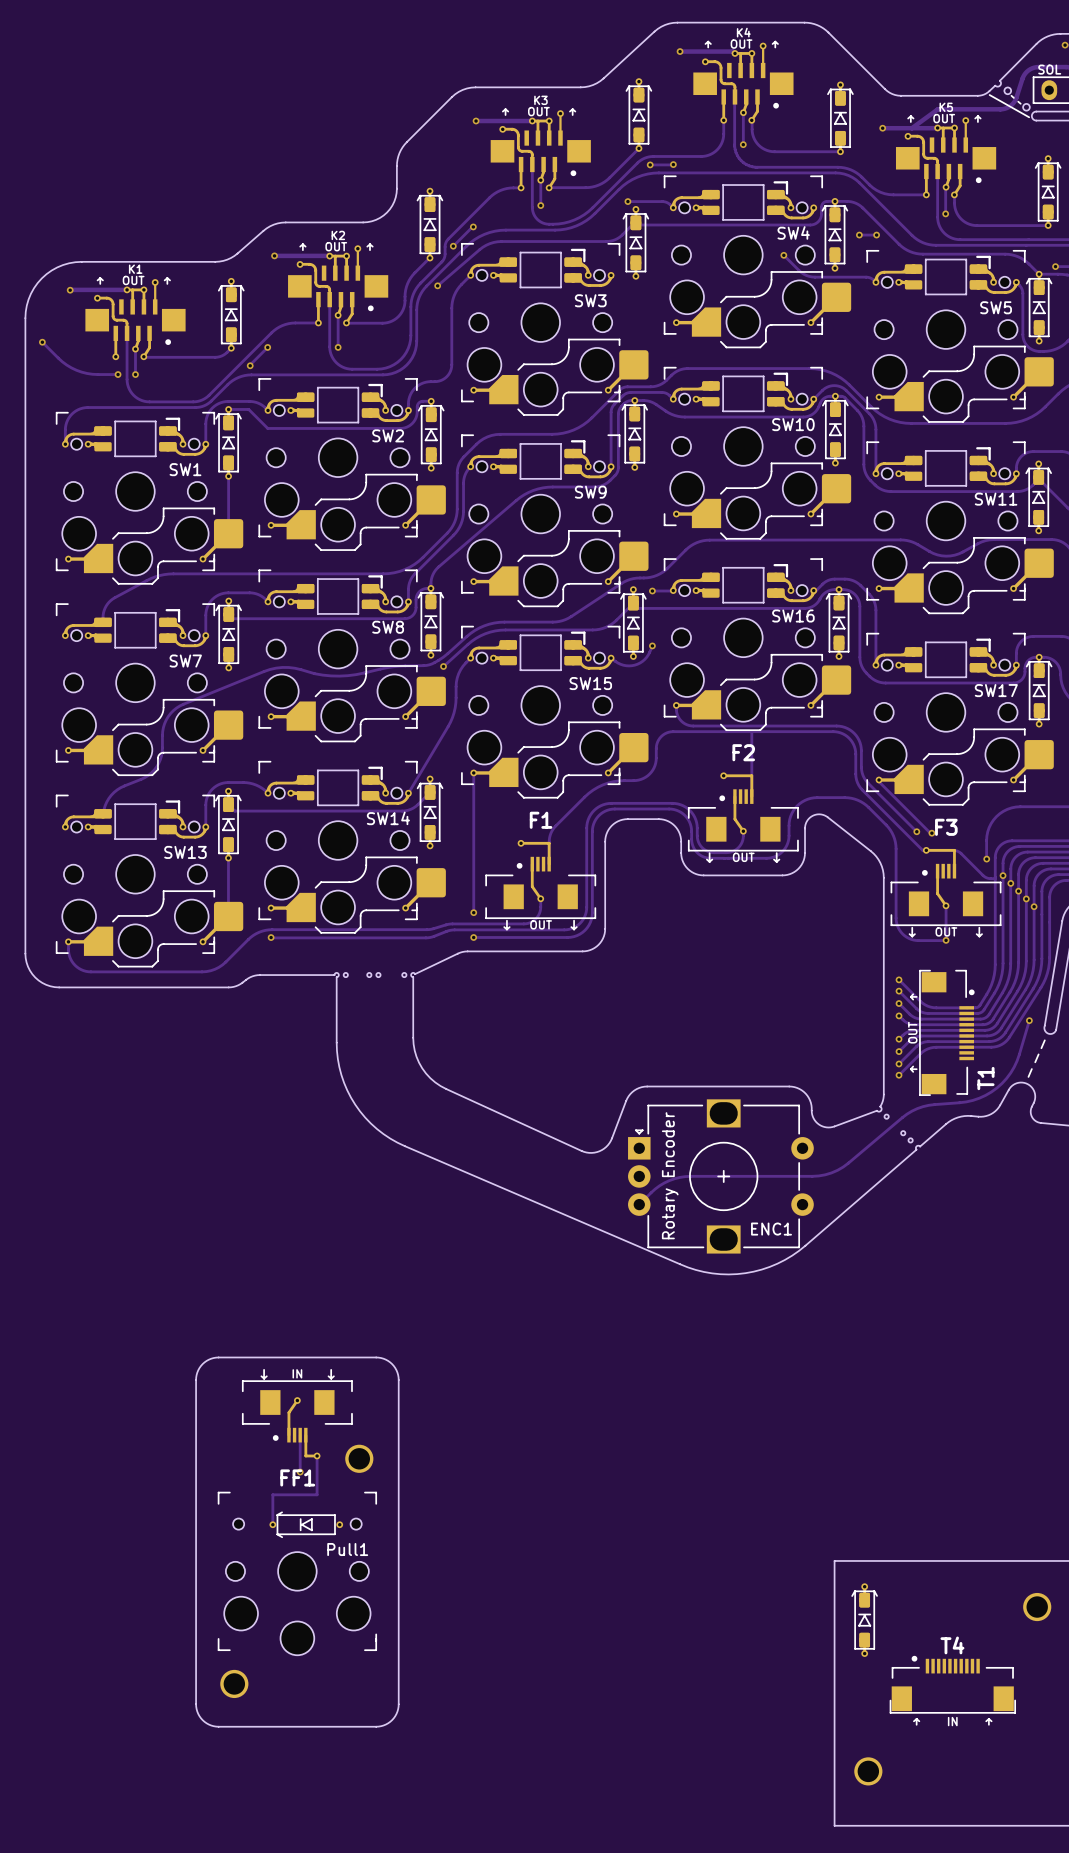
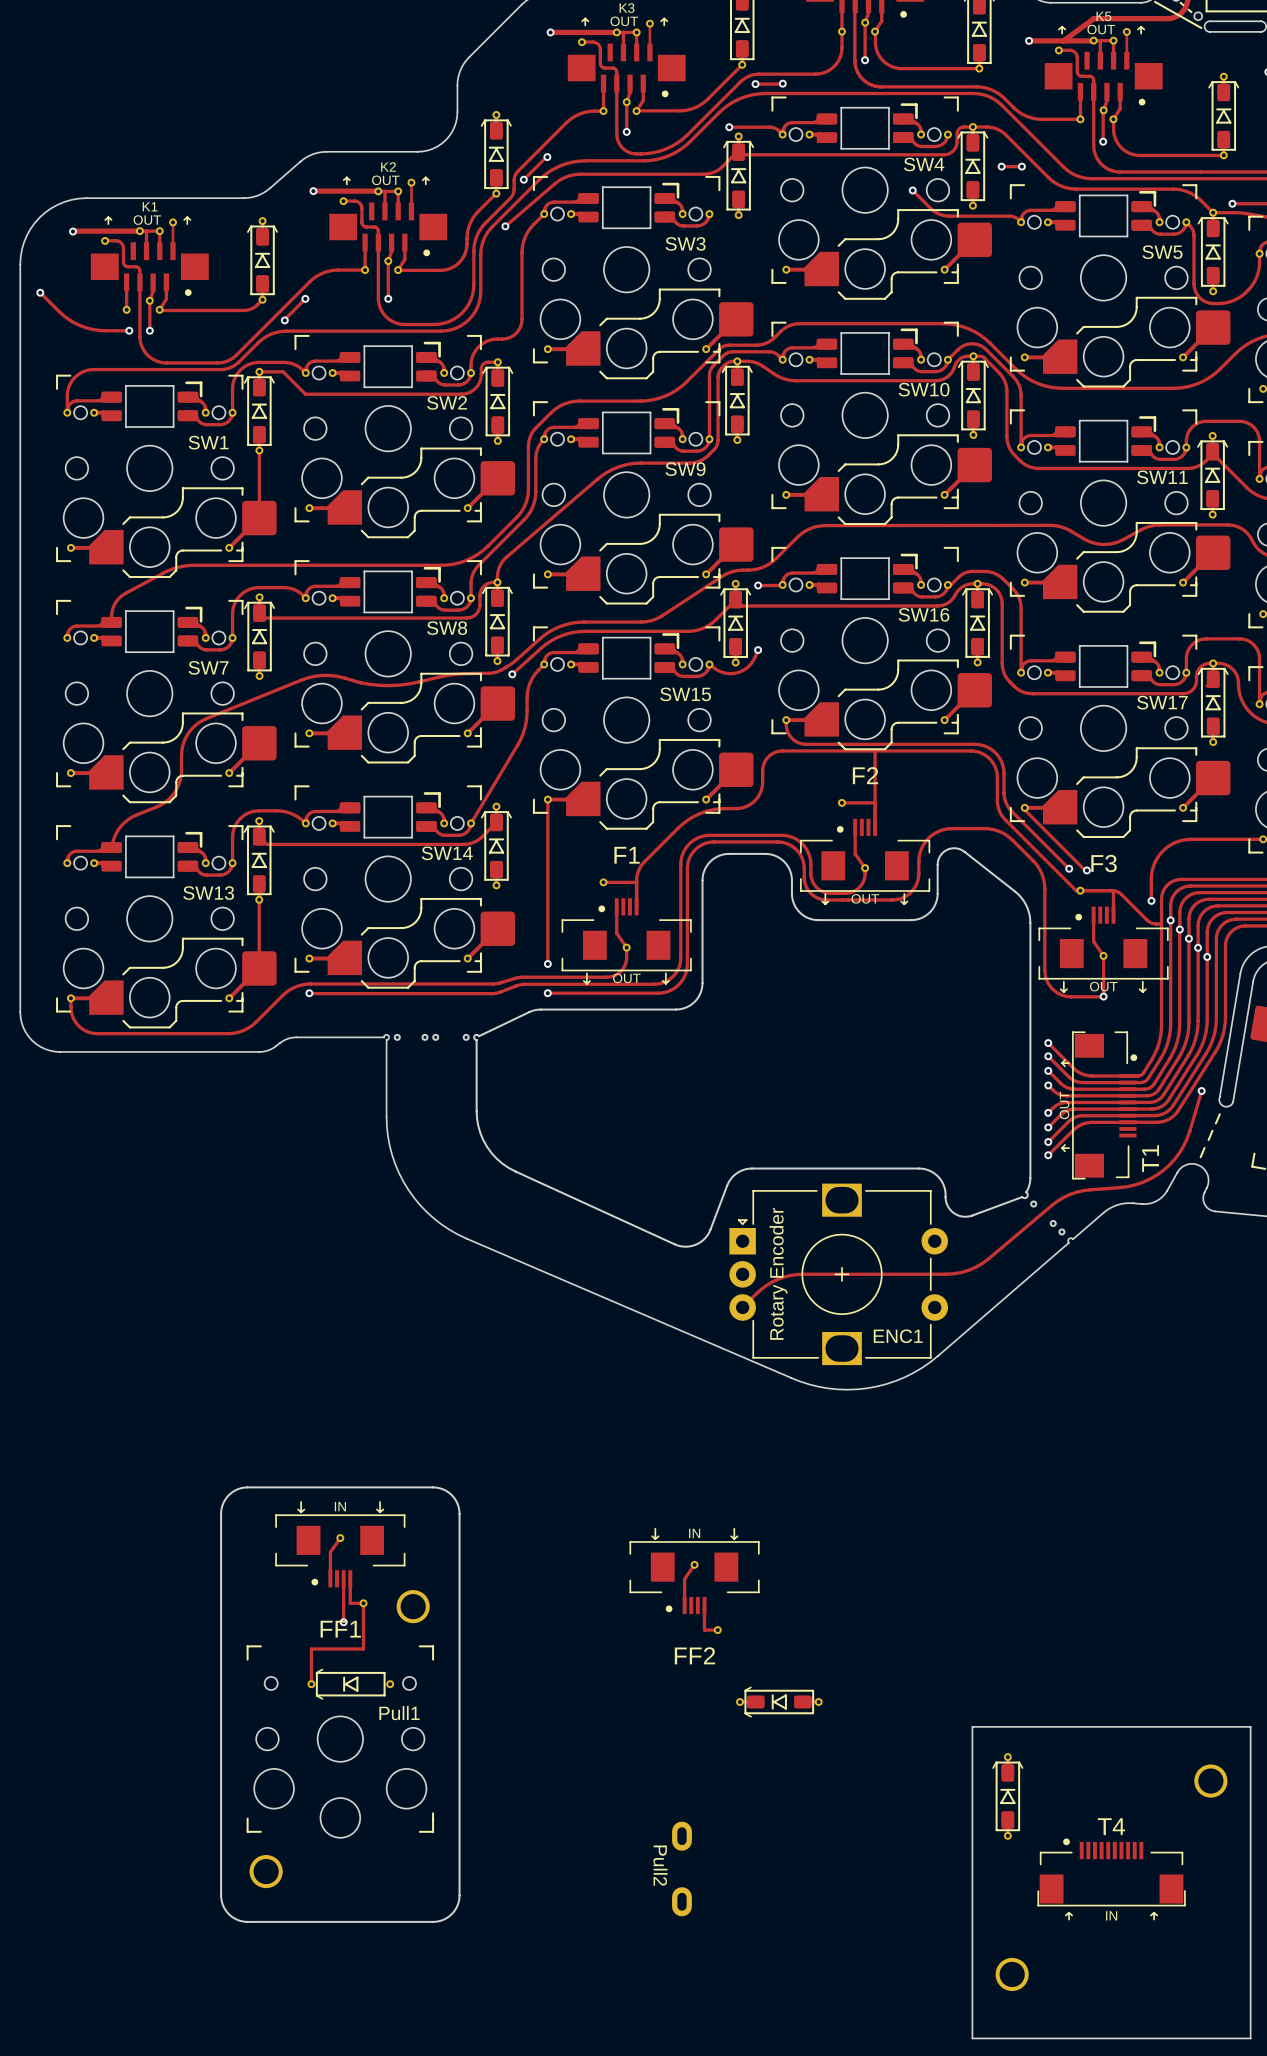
FF2: none -> (694, 1581)
part: none -> (779, 1702)
Pull2: none -> (681, 1868)

